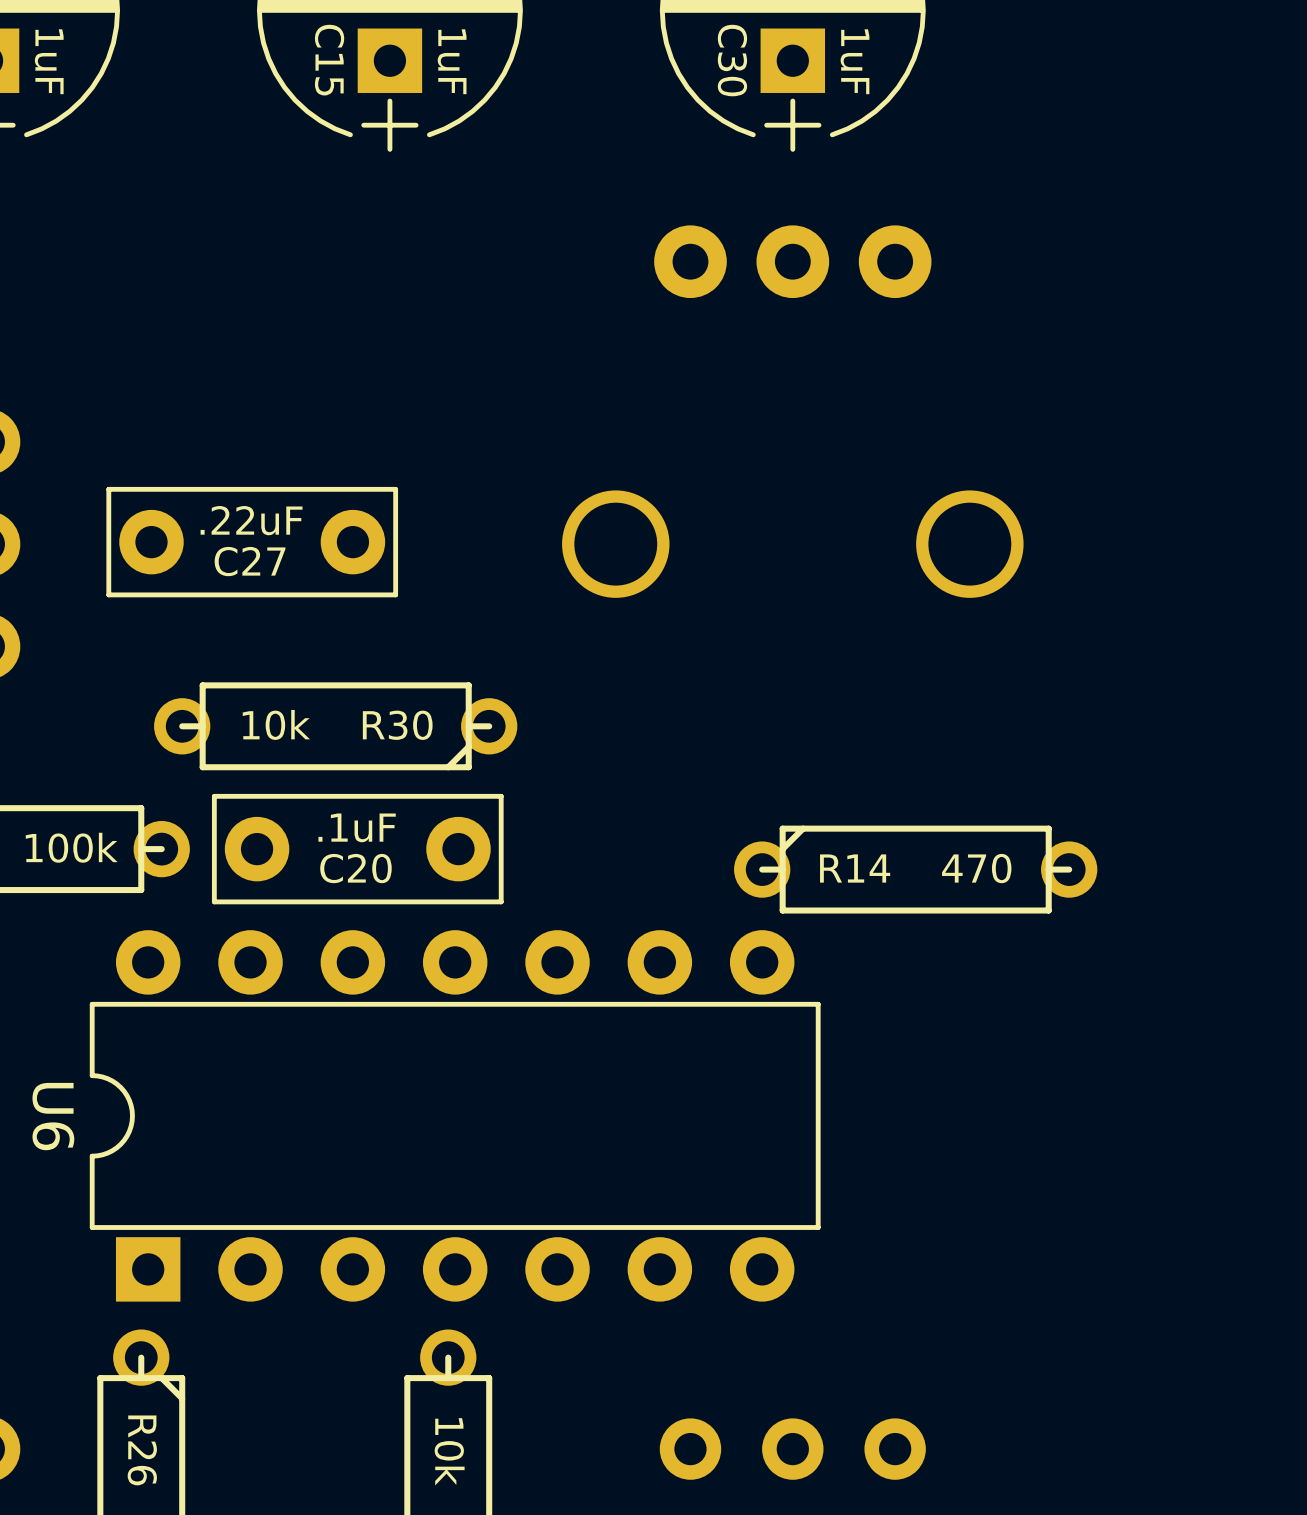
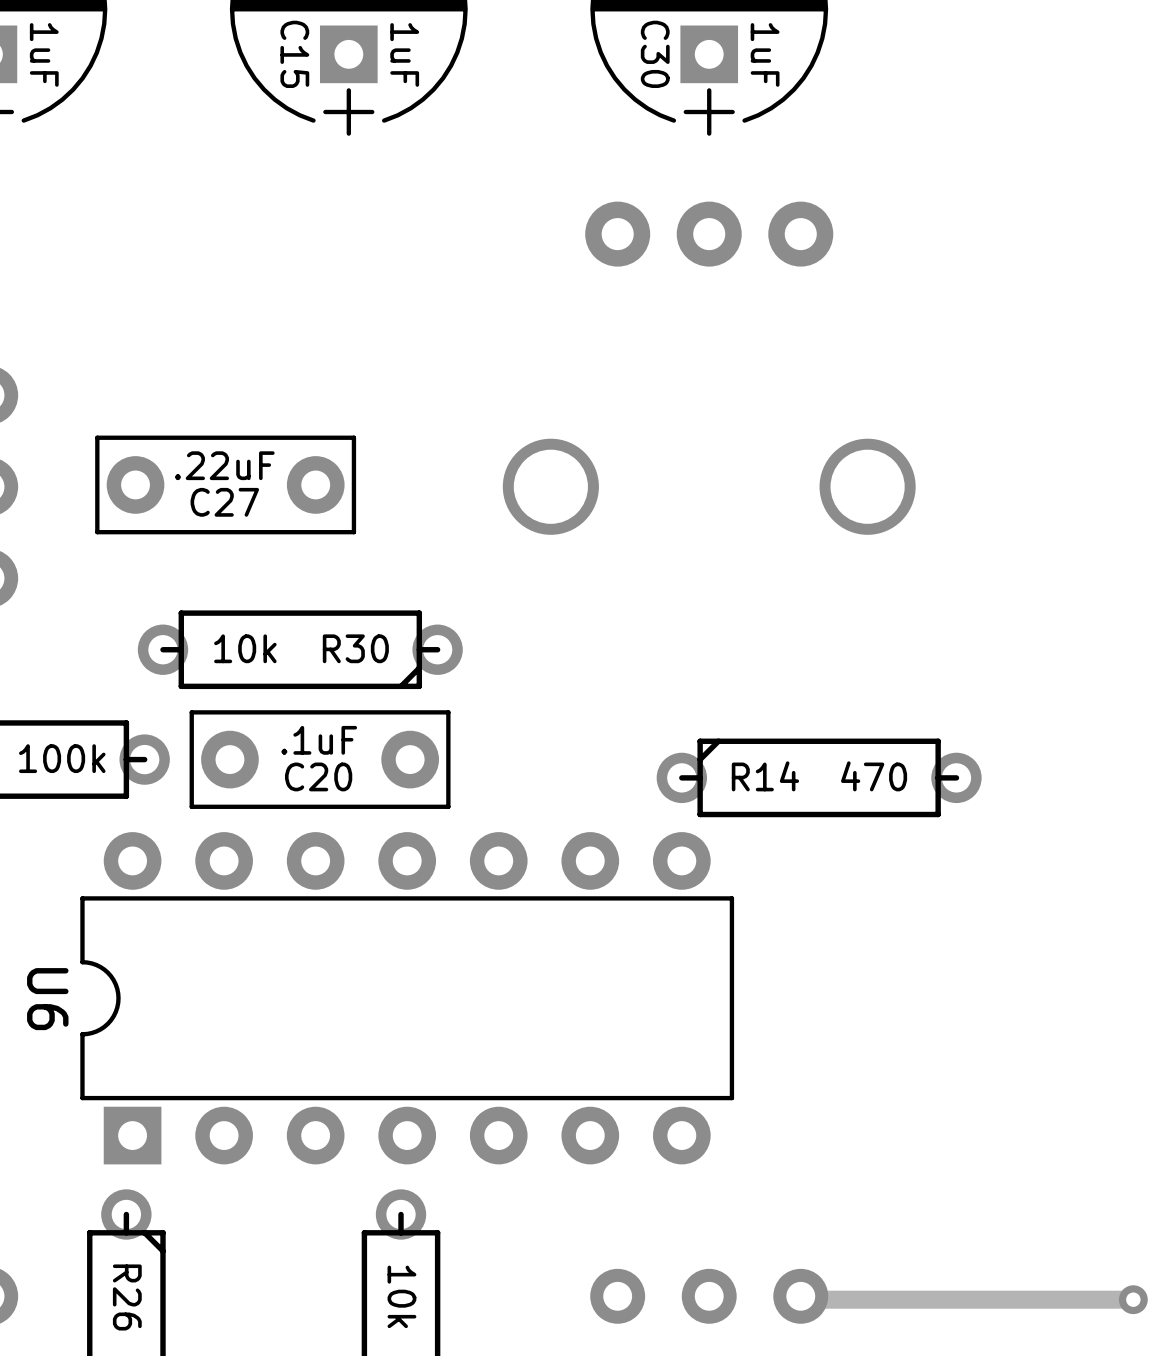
track: none -> (800, 1296) (804, 1299) (1133, 1299)
via: none -> (1133, 1299)

